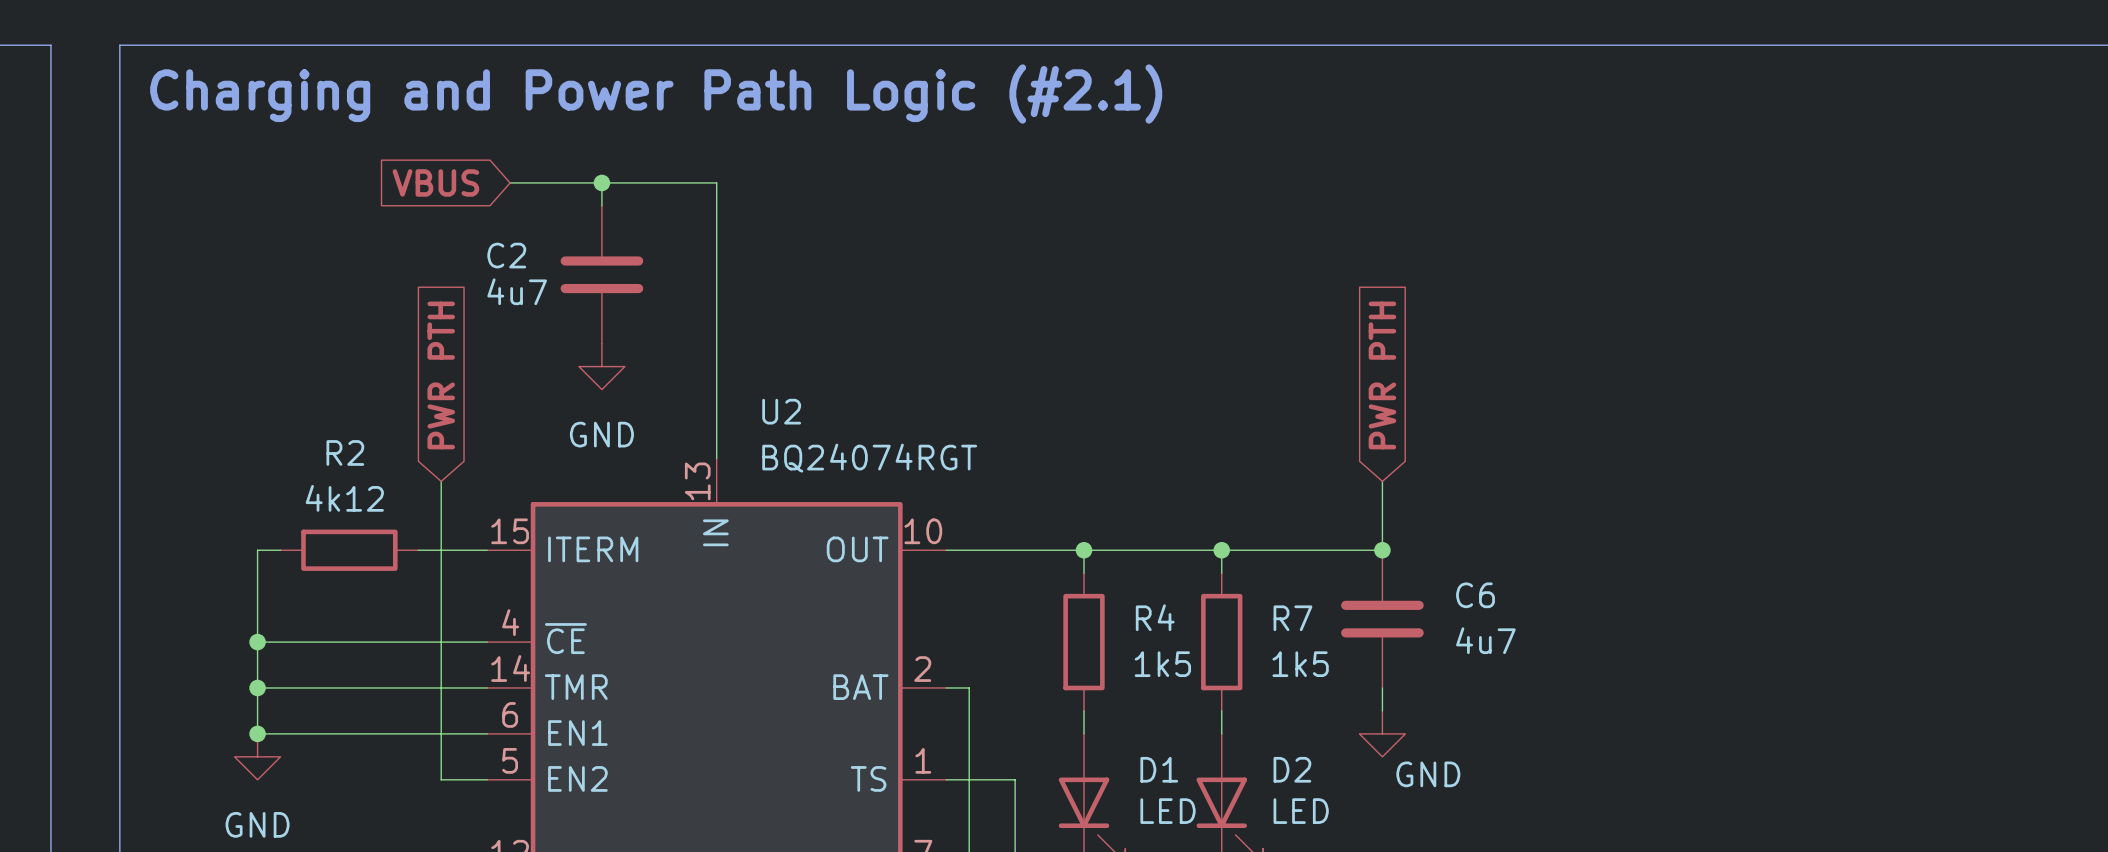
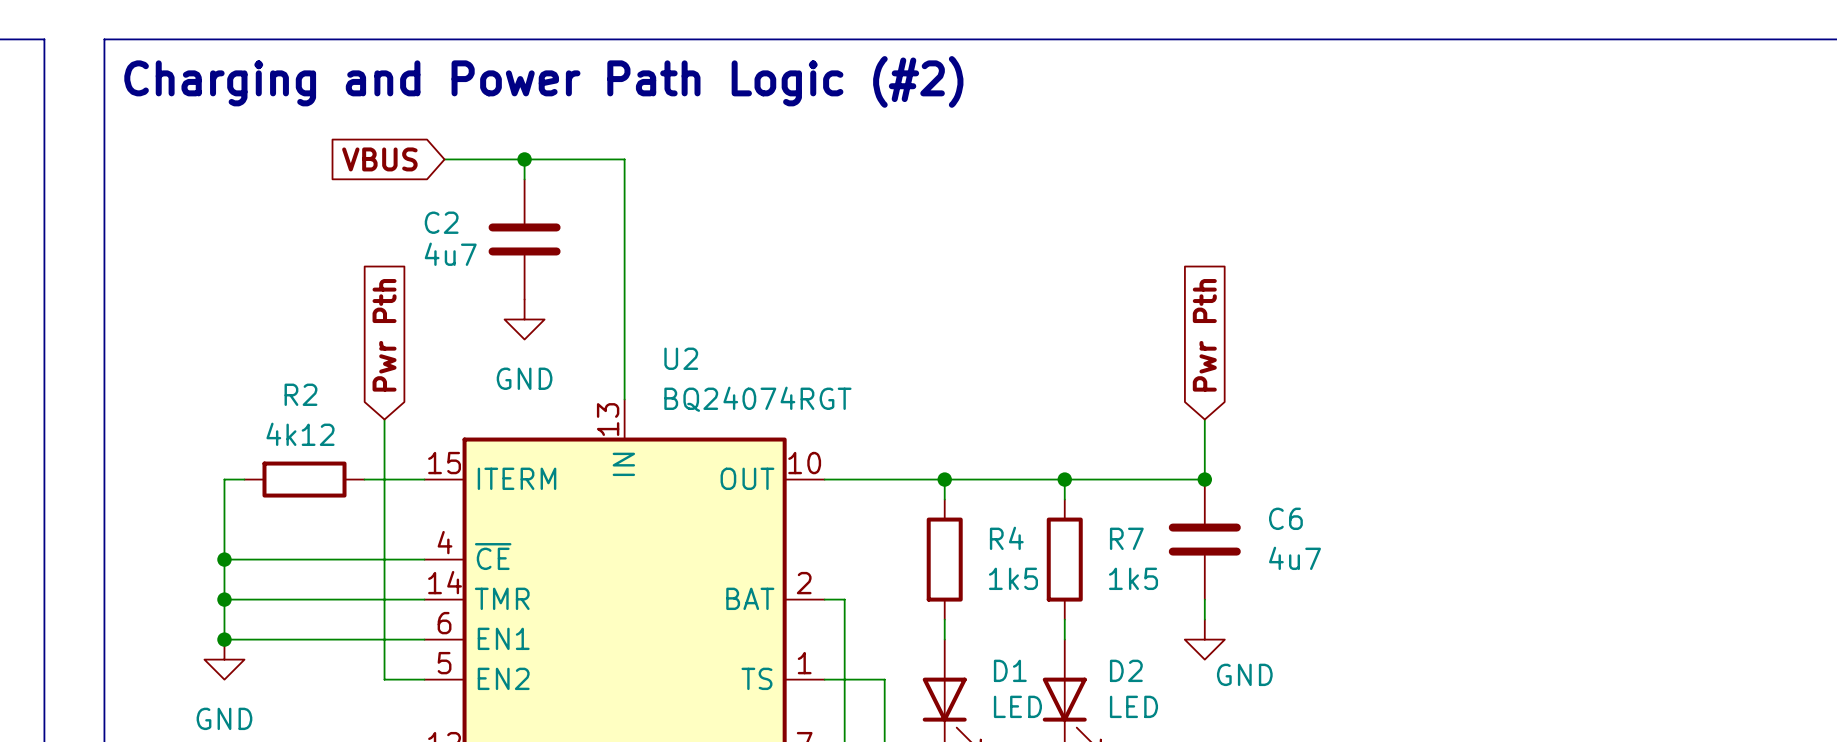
text: Charging and Power Path Logic (#2.1) (656, 94) -> Charging and Power Path Logic (#2) (543, 81)
global label: PWR PTH (441, 375) -> Pwr Pth (384, 335)
global label: PWR PTH (1382, 375) -> Pwr Pth (1204, 335)

